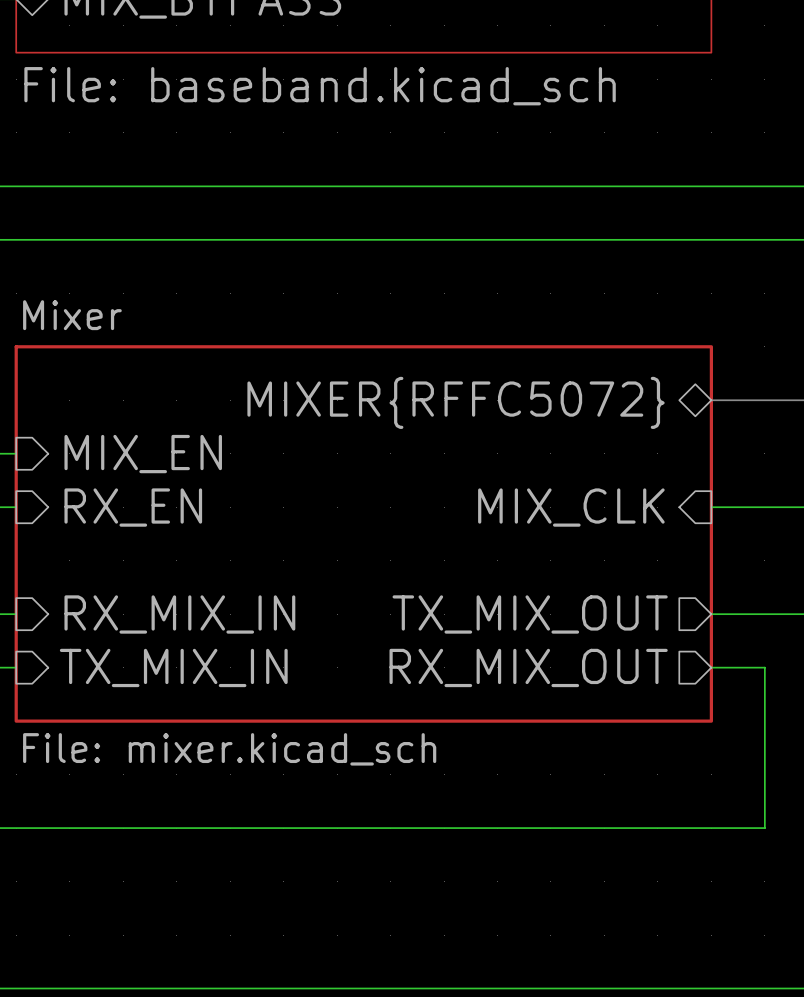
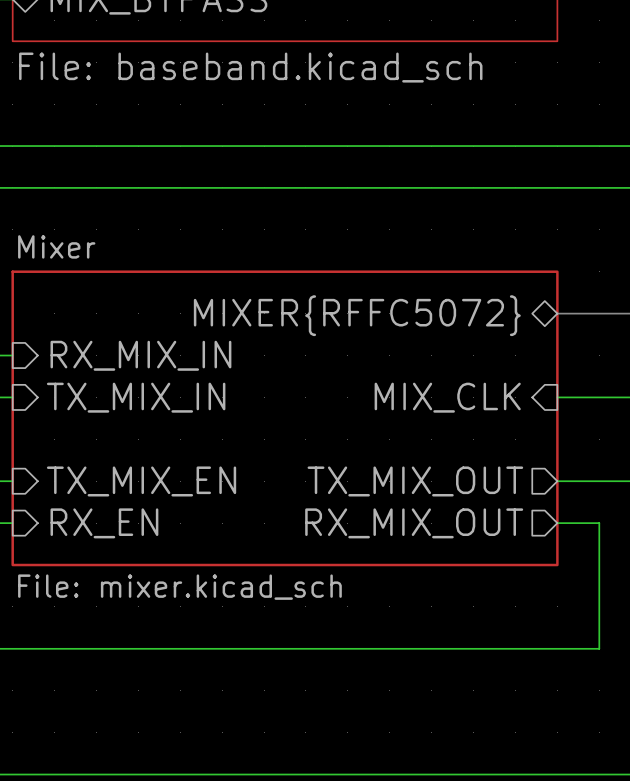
sheet pin: MIX_EN (143, 454) -> RX_MIX_IN (140, 355)
sheet pin: RX_EN (133, 507) -> TX_MIX_IN (136, 397)
sheet pin: RX_MIX_IN (179, 614) -> TX_MIX_EN (141, 481)
sheet pin: TX_MIX_IN (173, 667) -> RX_EN (104, 523)

